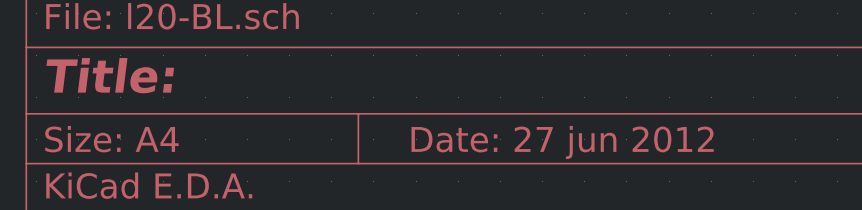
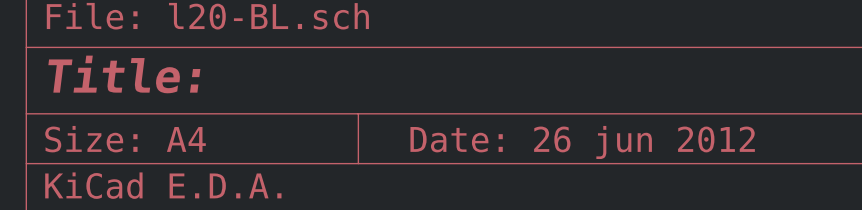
title block: Date: 27 jun 2012 (562, 142) -> Date: 26 jun 2012 (582, 142)

